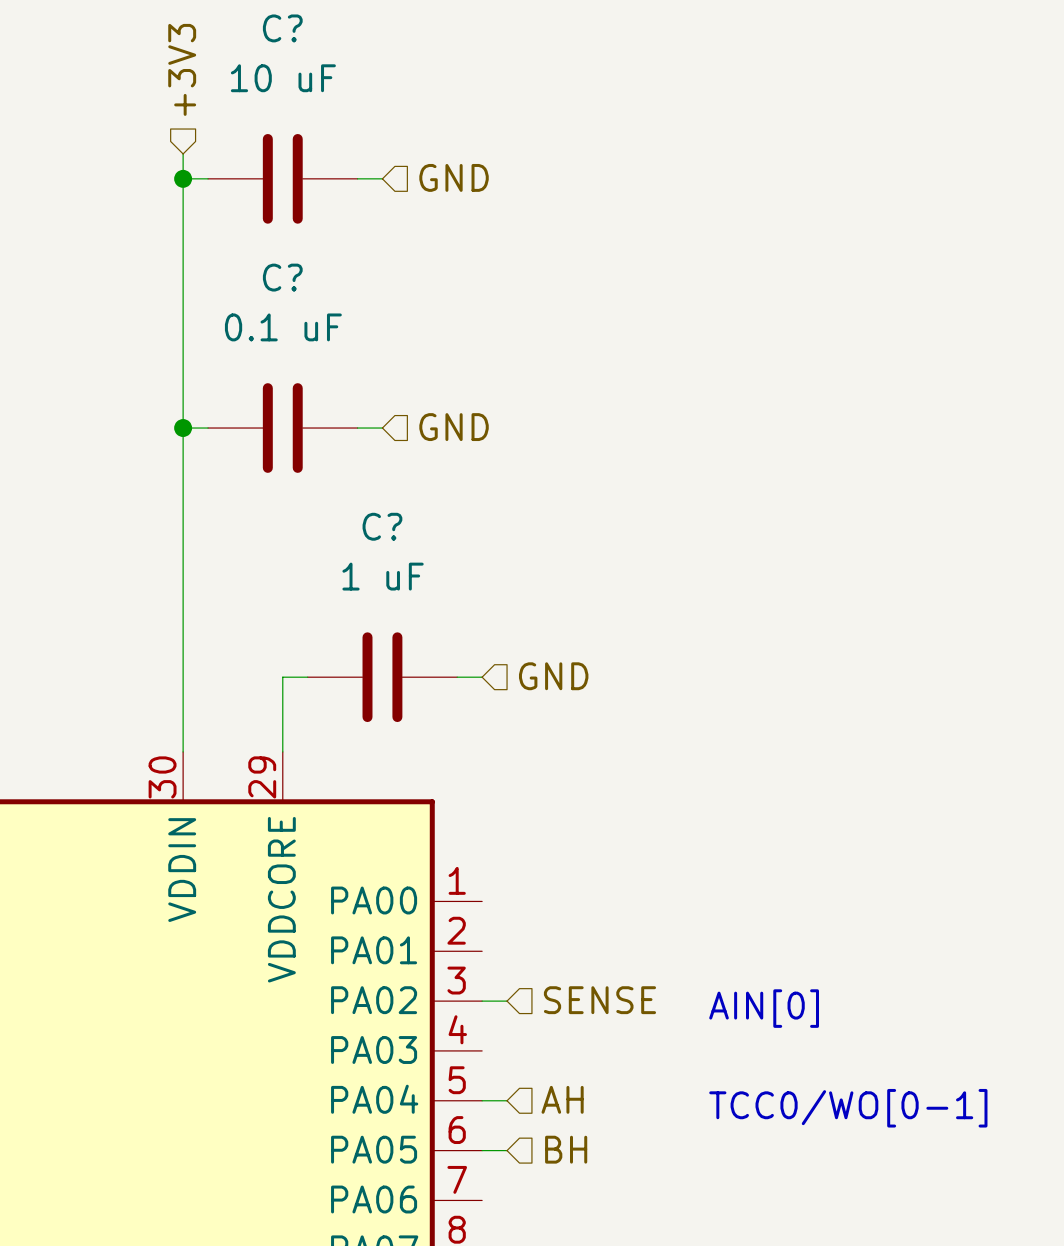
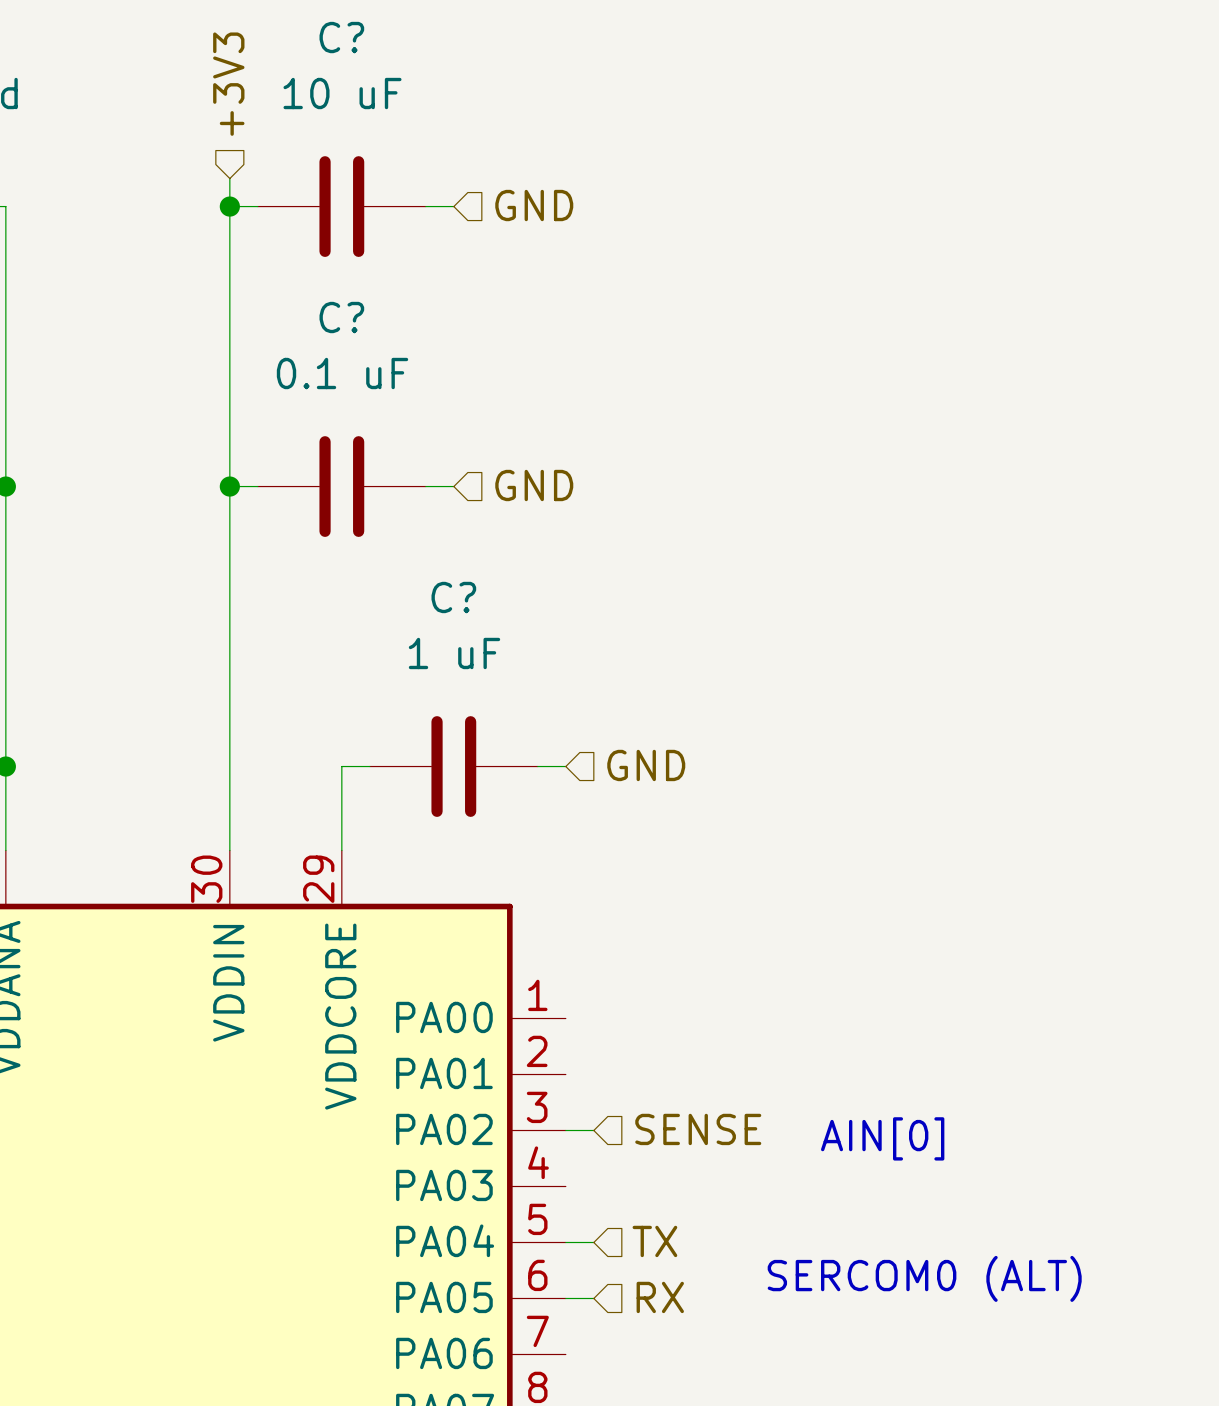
hierarchical label: AH (562, 1099) -> TX (654, 1241)
text: TCC0/WO[0-1] (848, 1108) -> none
text: none -> SERCOM0 (ALT) (924, 1278)
hierarchical label: BH (566, 1149) -> RX (660, 1297)

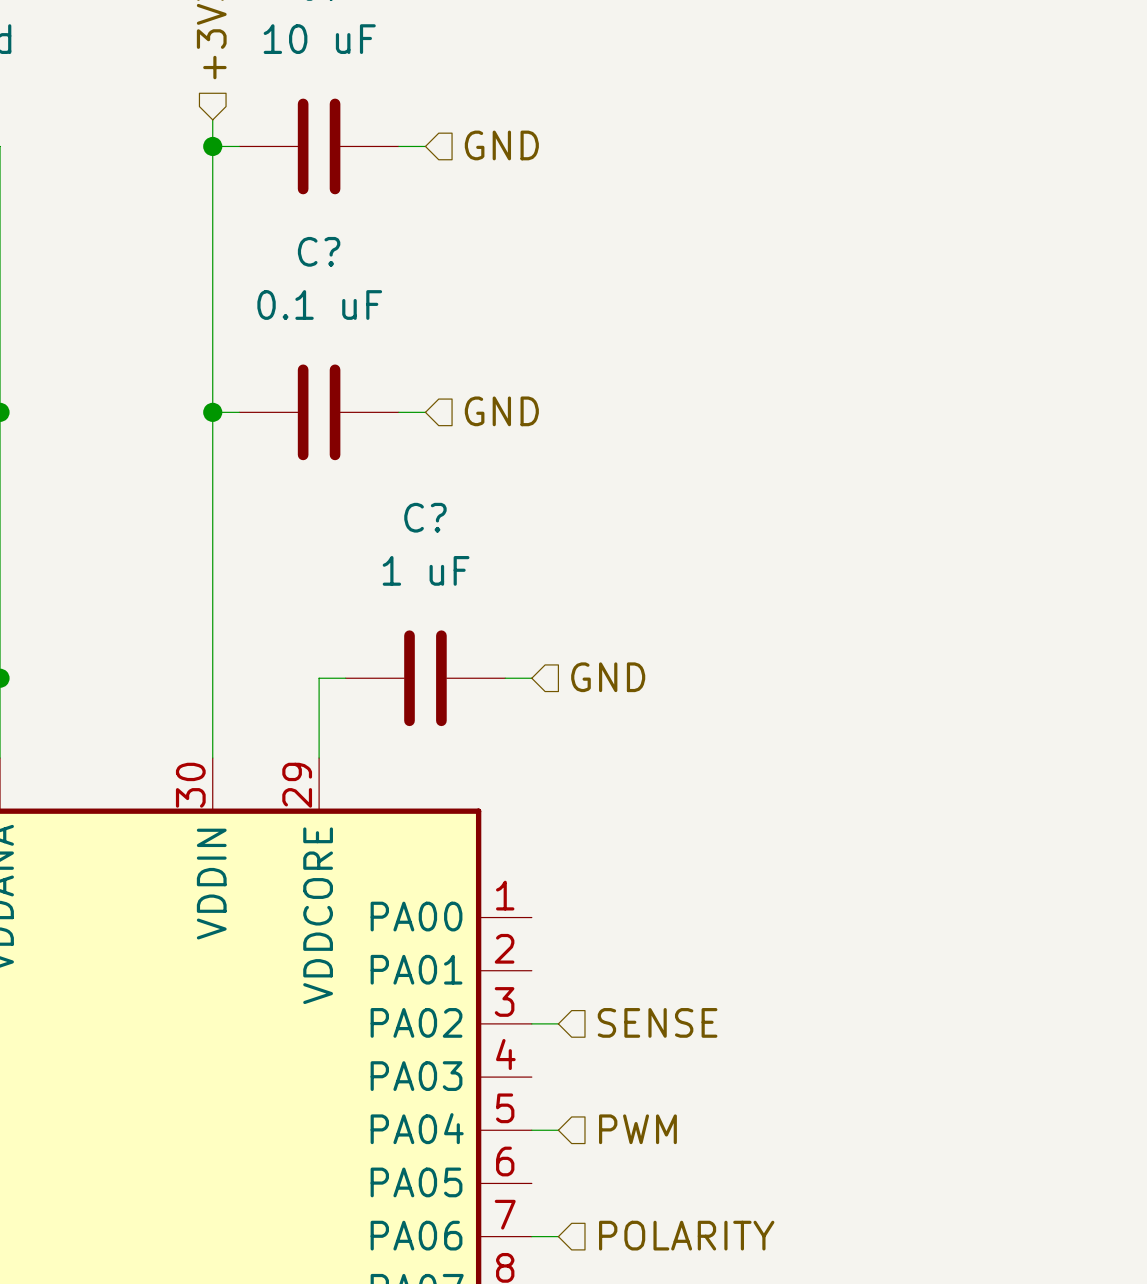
text: AIN[0] (882, 1138) -> none
hierarchical label: TX (654, 1241) -> PWM (637, 1129)
text: SERCOM0 (ALT) (924, 1278) -> none
hierarchical label: RX (660, 1297) -> none
wire: (565, 1298) (593, 1298) -> (531, 1236) (558, 1236)
hierarchical label: none -> POLARITY (686, 1235)

